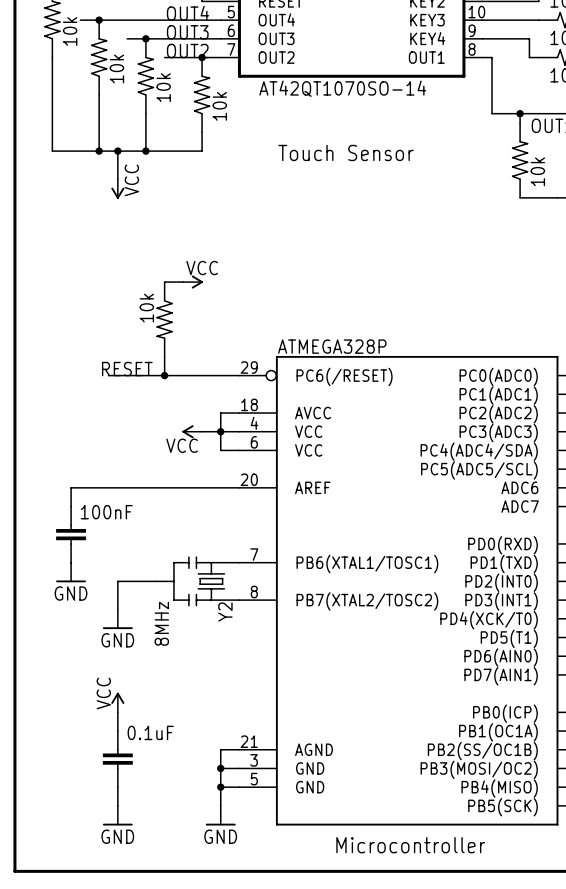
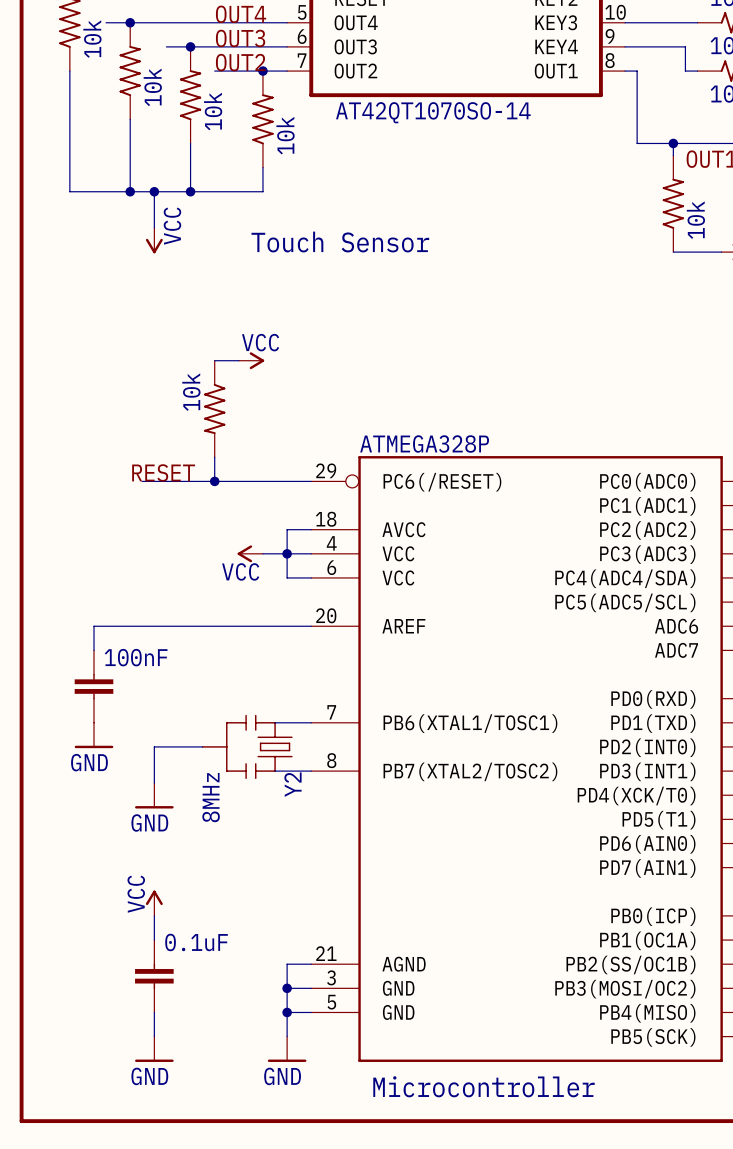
text position: Touch Sensor (345, 152) -> Touch Sensor (340, 242)
text position: Microcontroller (410, 845) -> Microcontroller (484, 1086)

